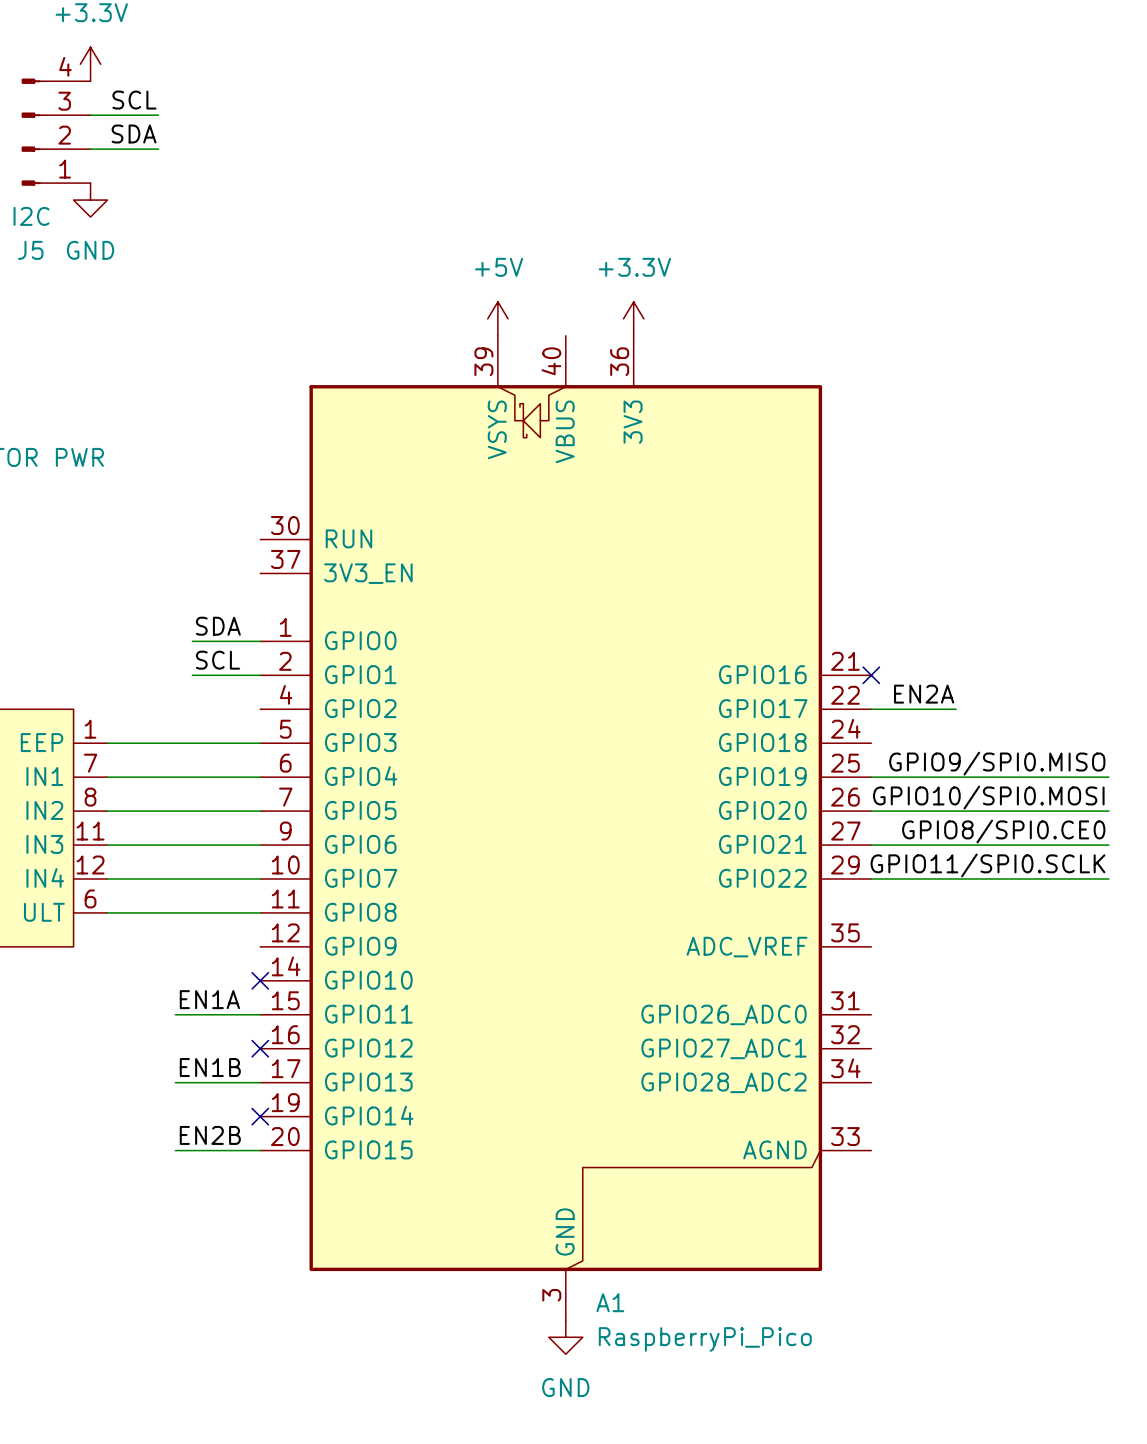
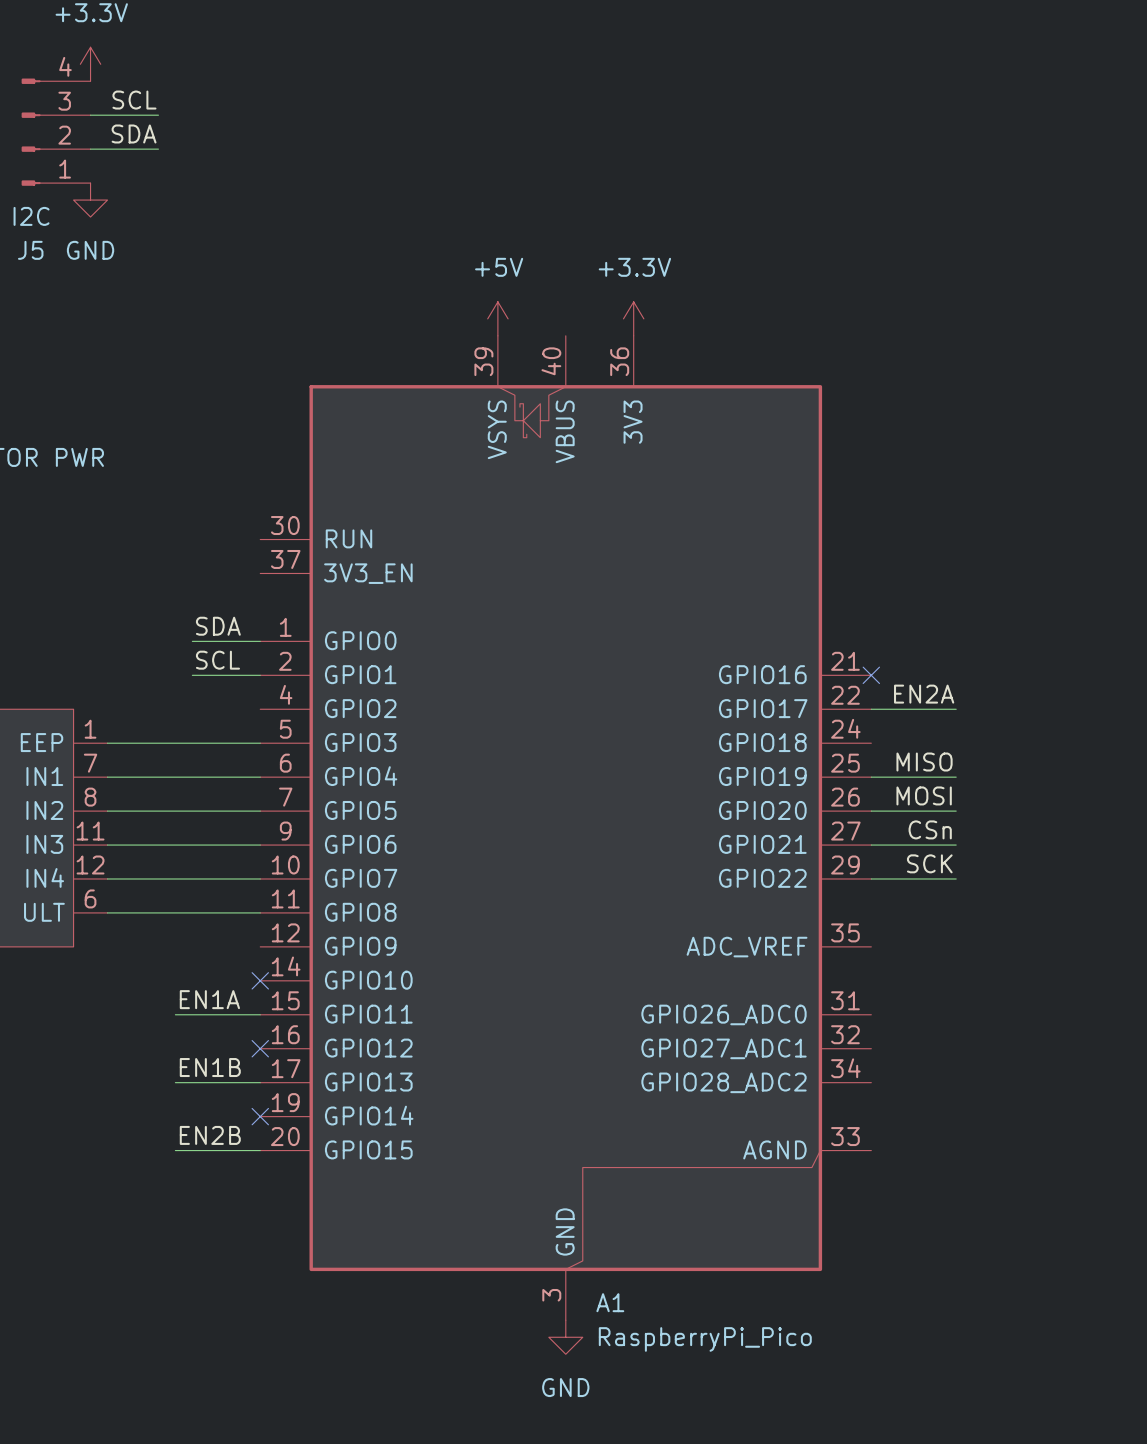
label: none -> MISO (924, 762)
label: GPIO9/SPI0.MISO (997, 763) -> none
wire: (956, 777) (1108, 777) -> none
label: none -> MOSI (924, 795)
label: GPIO10/SPI0.MOSI (988, 797) -> none
wire: (956, 811) (1108, 811) -> none
label: none -> CSn (930, 829)
label: GPIO8/SPI0.CE0 (1003, 831) -> none
wire: (956, 845) (1108, 845) -> none
label: none -> SCK (929, 863)
label: GPIO11/SPI0.SCLK (987, 865) -> none
wire: (956, 878) (1108, 878) -> none

